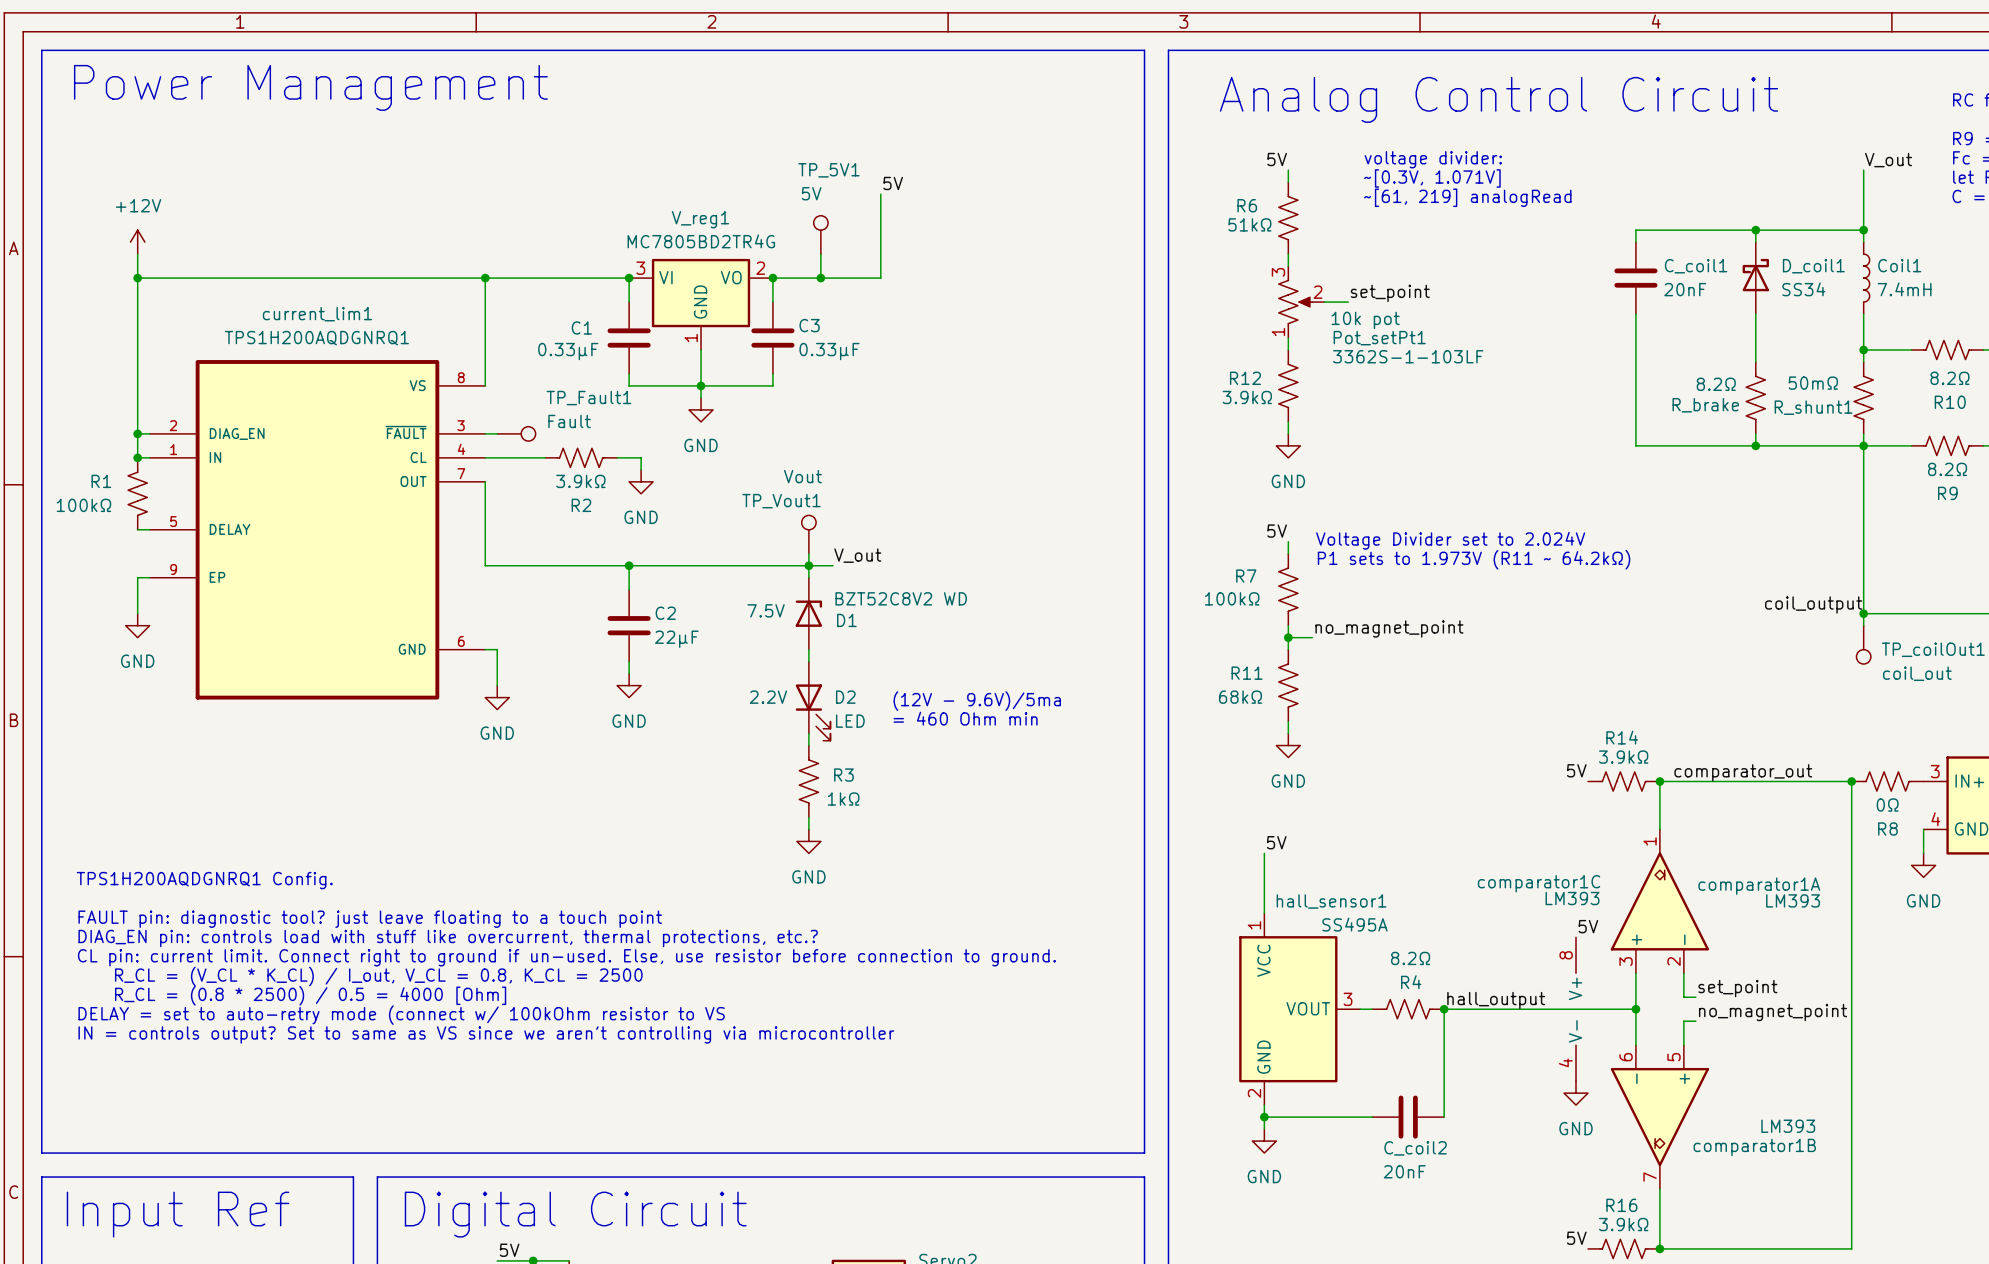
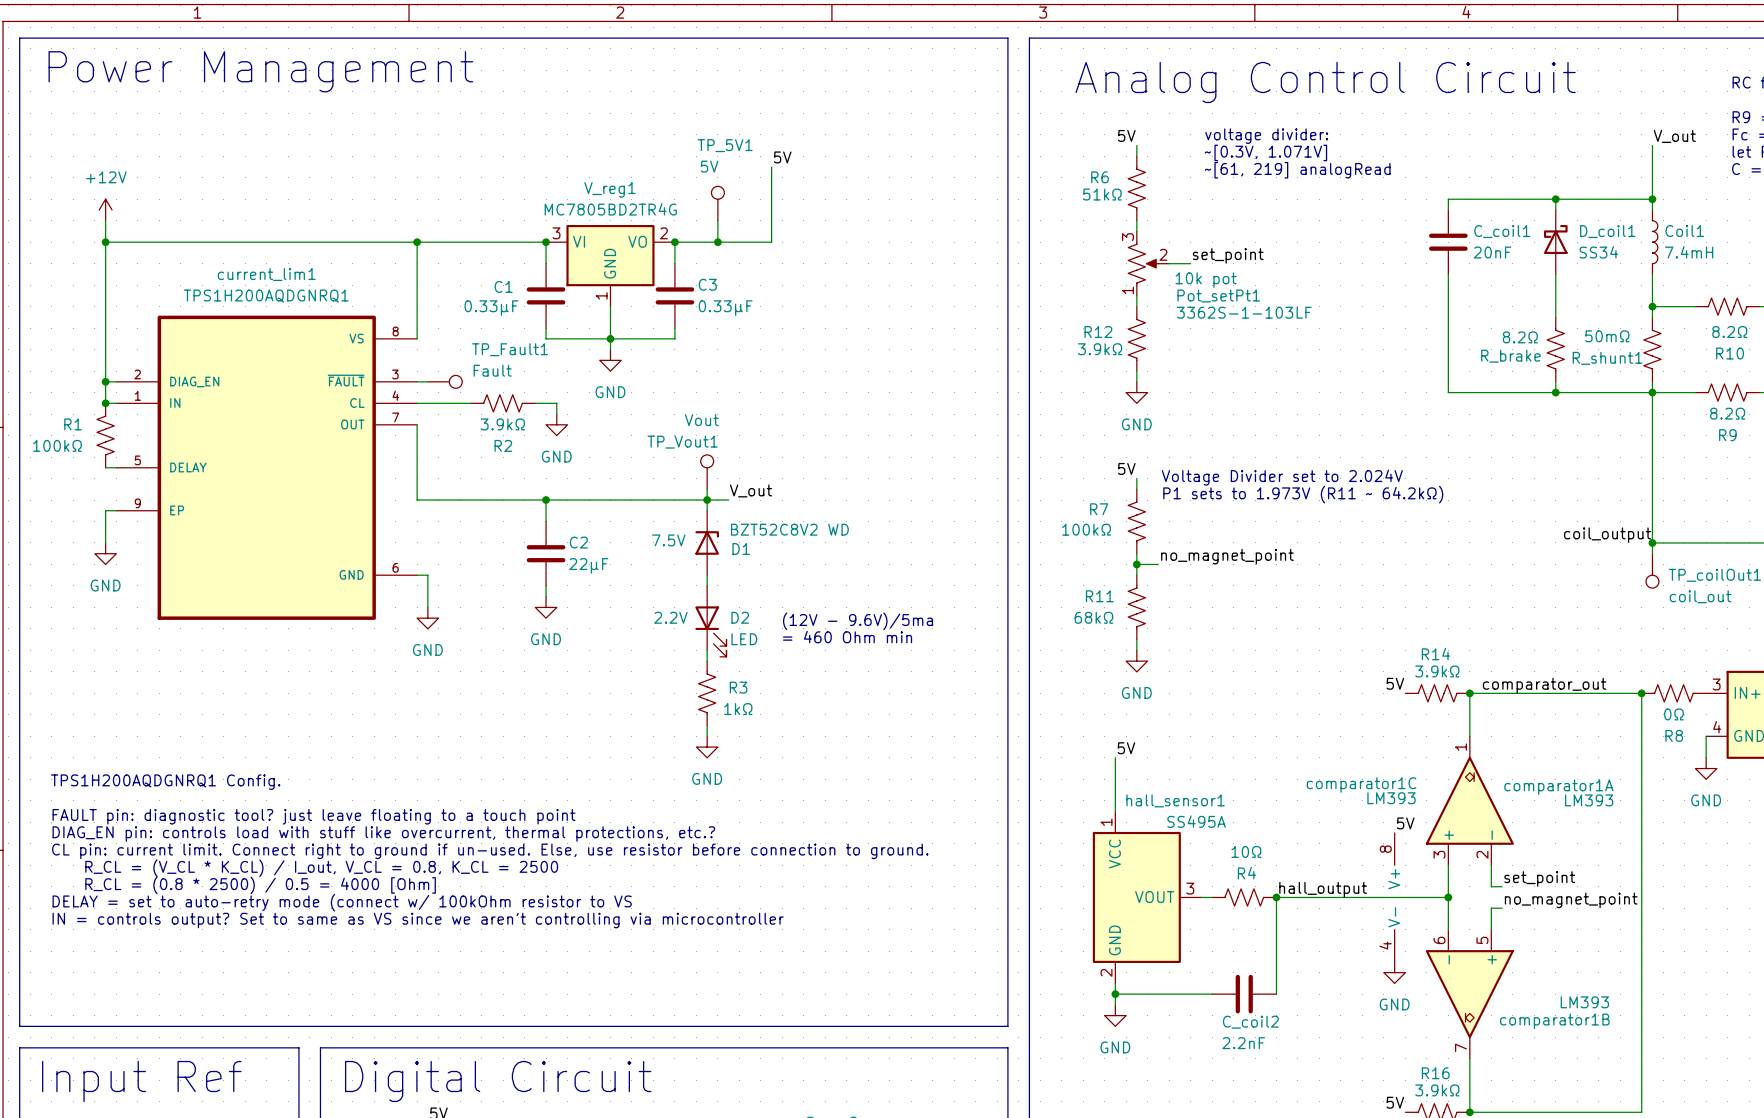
R4 value: 8.2Ω (1410, 958) -> 10Ω (1246, 851)
C_coil2 value: 20nF (1404, 1171) -> 2.2nF (1243, 1043)

